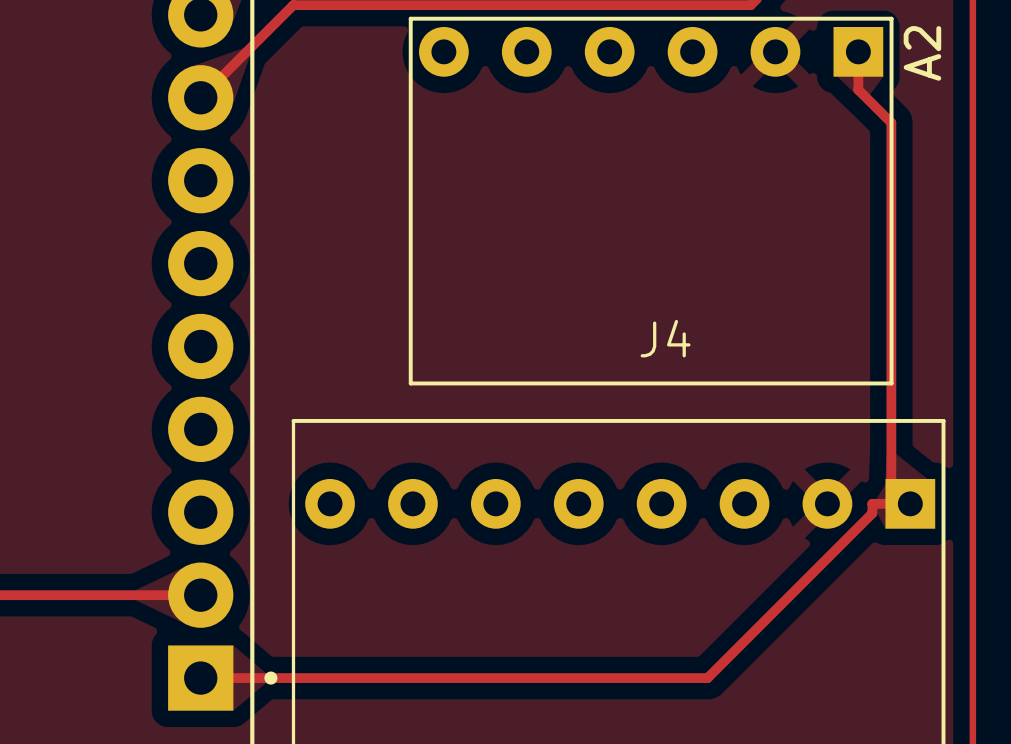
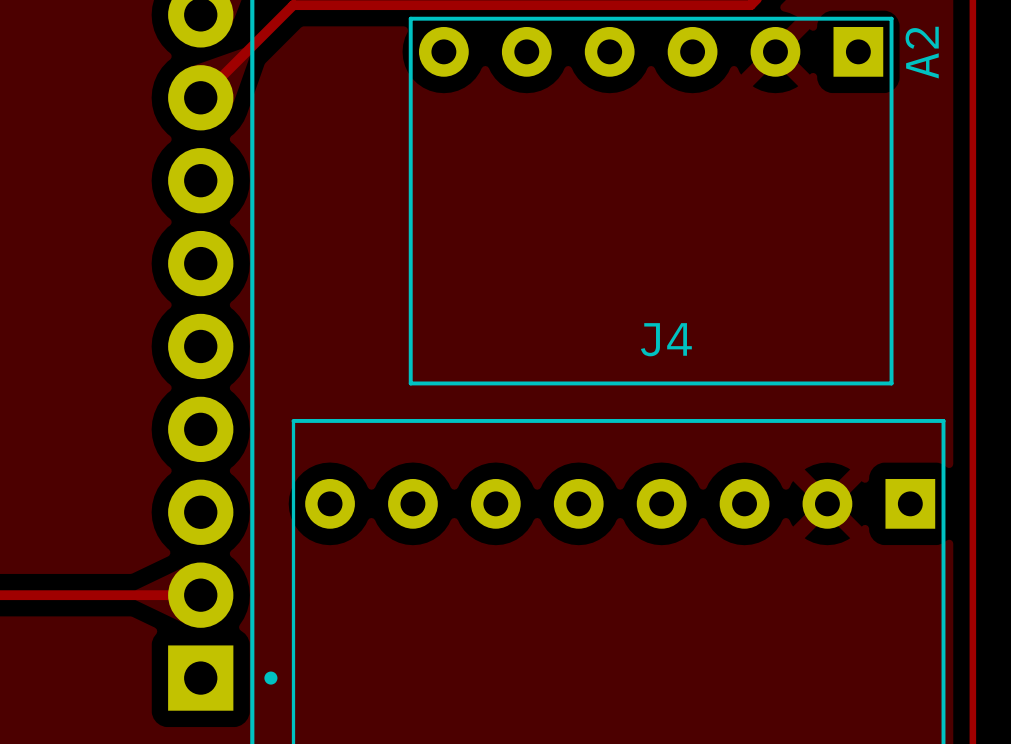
track: (858, 51) (858, 89) (891, 122) (891, 503) -> none
track: (910, 503) (872, 503) (872, 513) (707, 678) (200, 678) -> none

